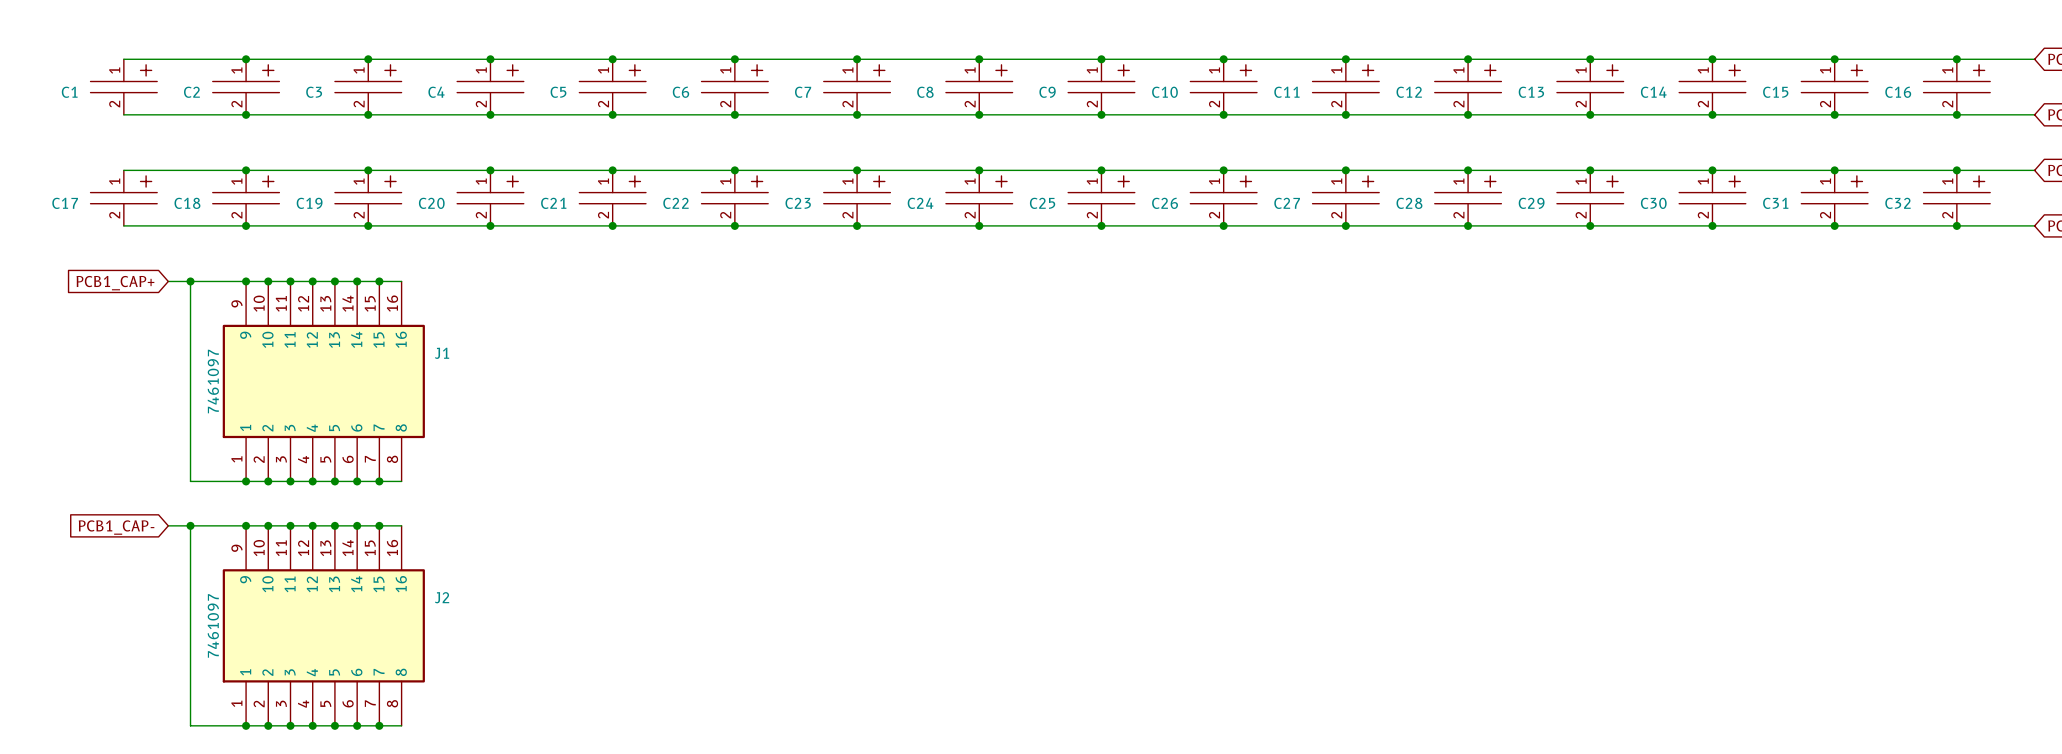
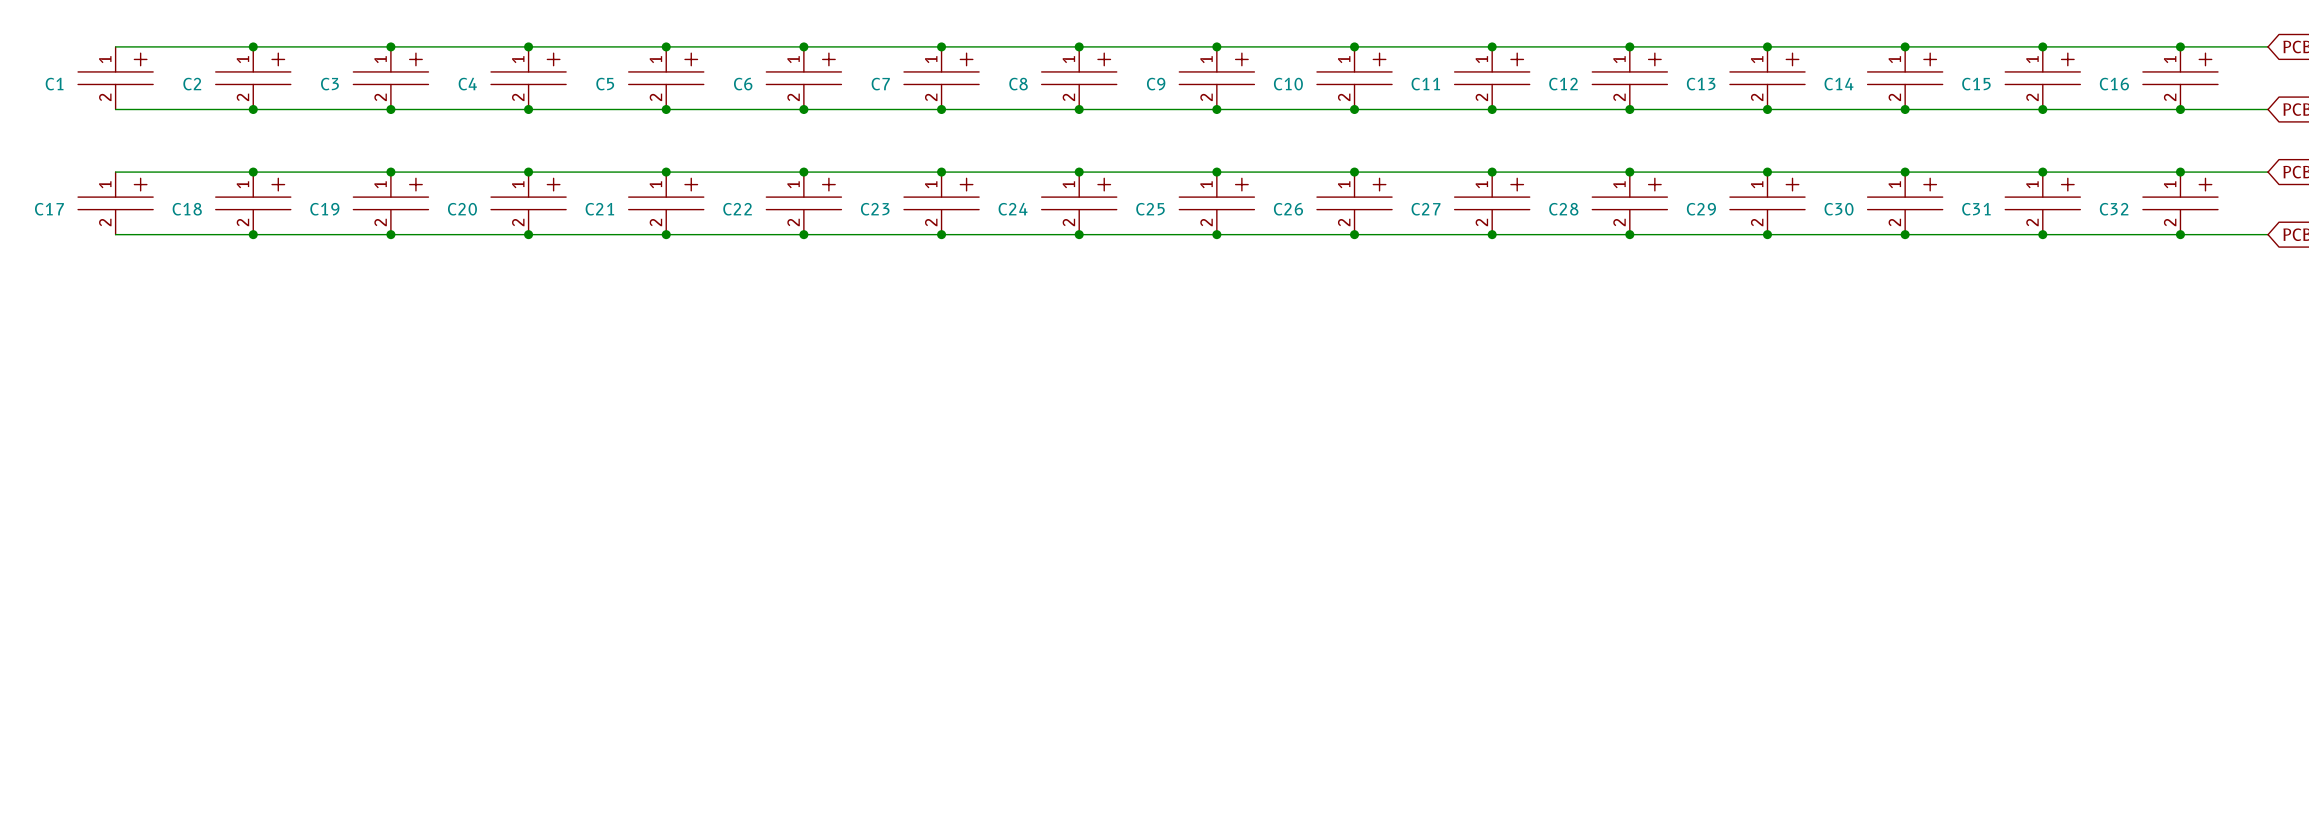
wire: (168, 281) (401, 281) -> none
wire: (190, 281) (190, 481) (401, 481) -> none
junction: (190, 281) -> none
junction: (246, 281) -> none
junction: (268, 281) -> none
junction: (290, 281) -> none
junction: (312, 281) -> none
junction: (334, 281) -> none
junction: (357, 281) -> none
junction: (379, 281) -> none
global label: PCB1_CAP+ (115, 283) -> none
J1: 7461097 (323, 381) -> none
junction: (246, 481) -> none
junction: (268, 481) -> none
junction: (290, 481) -> none
junction: (312, 481) -> none
junction: (334, 481) -> none
junction: (357, 481) -> none
junction: (379, 481) -> none
wire: (168, 525) (401, 525) -> none
wire: (190, 525) (190, 725) (401, 725) -> none
junction: (190, 525) -> none
junction: (246, 525) -> none
junction: (268, 525) -> none
junction: (290, 525) -> none
junction: (312, 525) -> none
junction: (334, 525) -> none
junction: (357, 525) -> none
junction: (379, 525) -> none
global label: PCB1_CAP- (116, 527) -> none
J2: 7461097 (323, 625) -> none
junction: (246, 725) -> none
junction: (268, 725) -> none
junction: (290, 725) -> none
junction: (312, 725) -> none
junction: (334, 725) -> none
junction: (357, 725) -> none
junction: (379, 725) -> none

